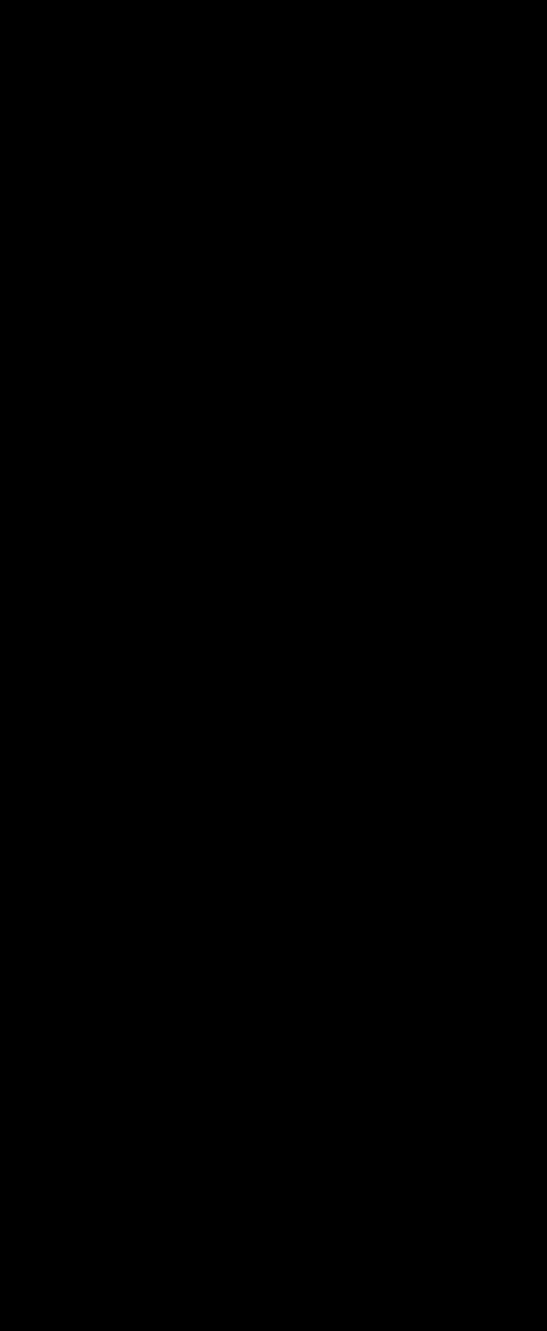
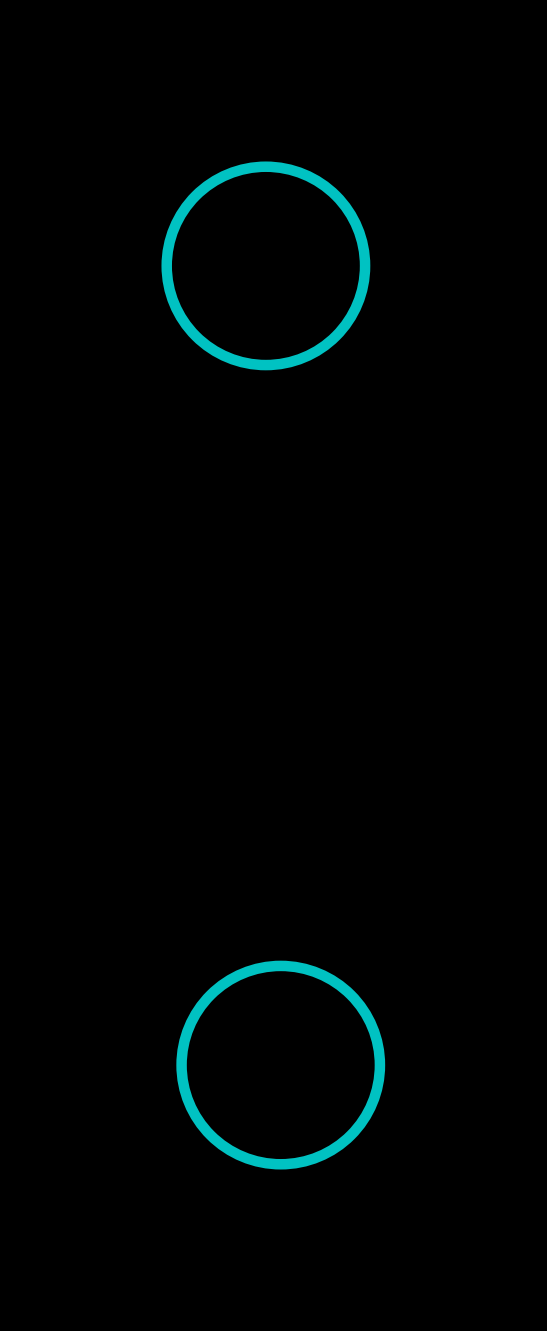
drawing: none -> [161, 161, 371, 371]
drawing: none -> [176, 960, 386, 1170]

